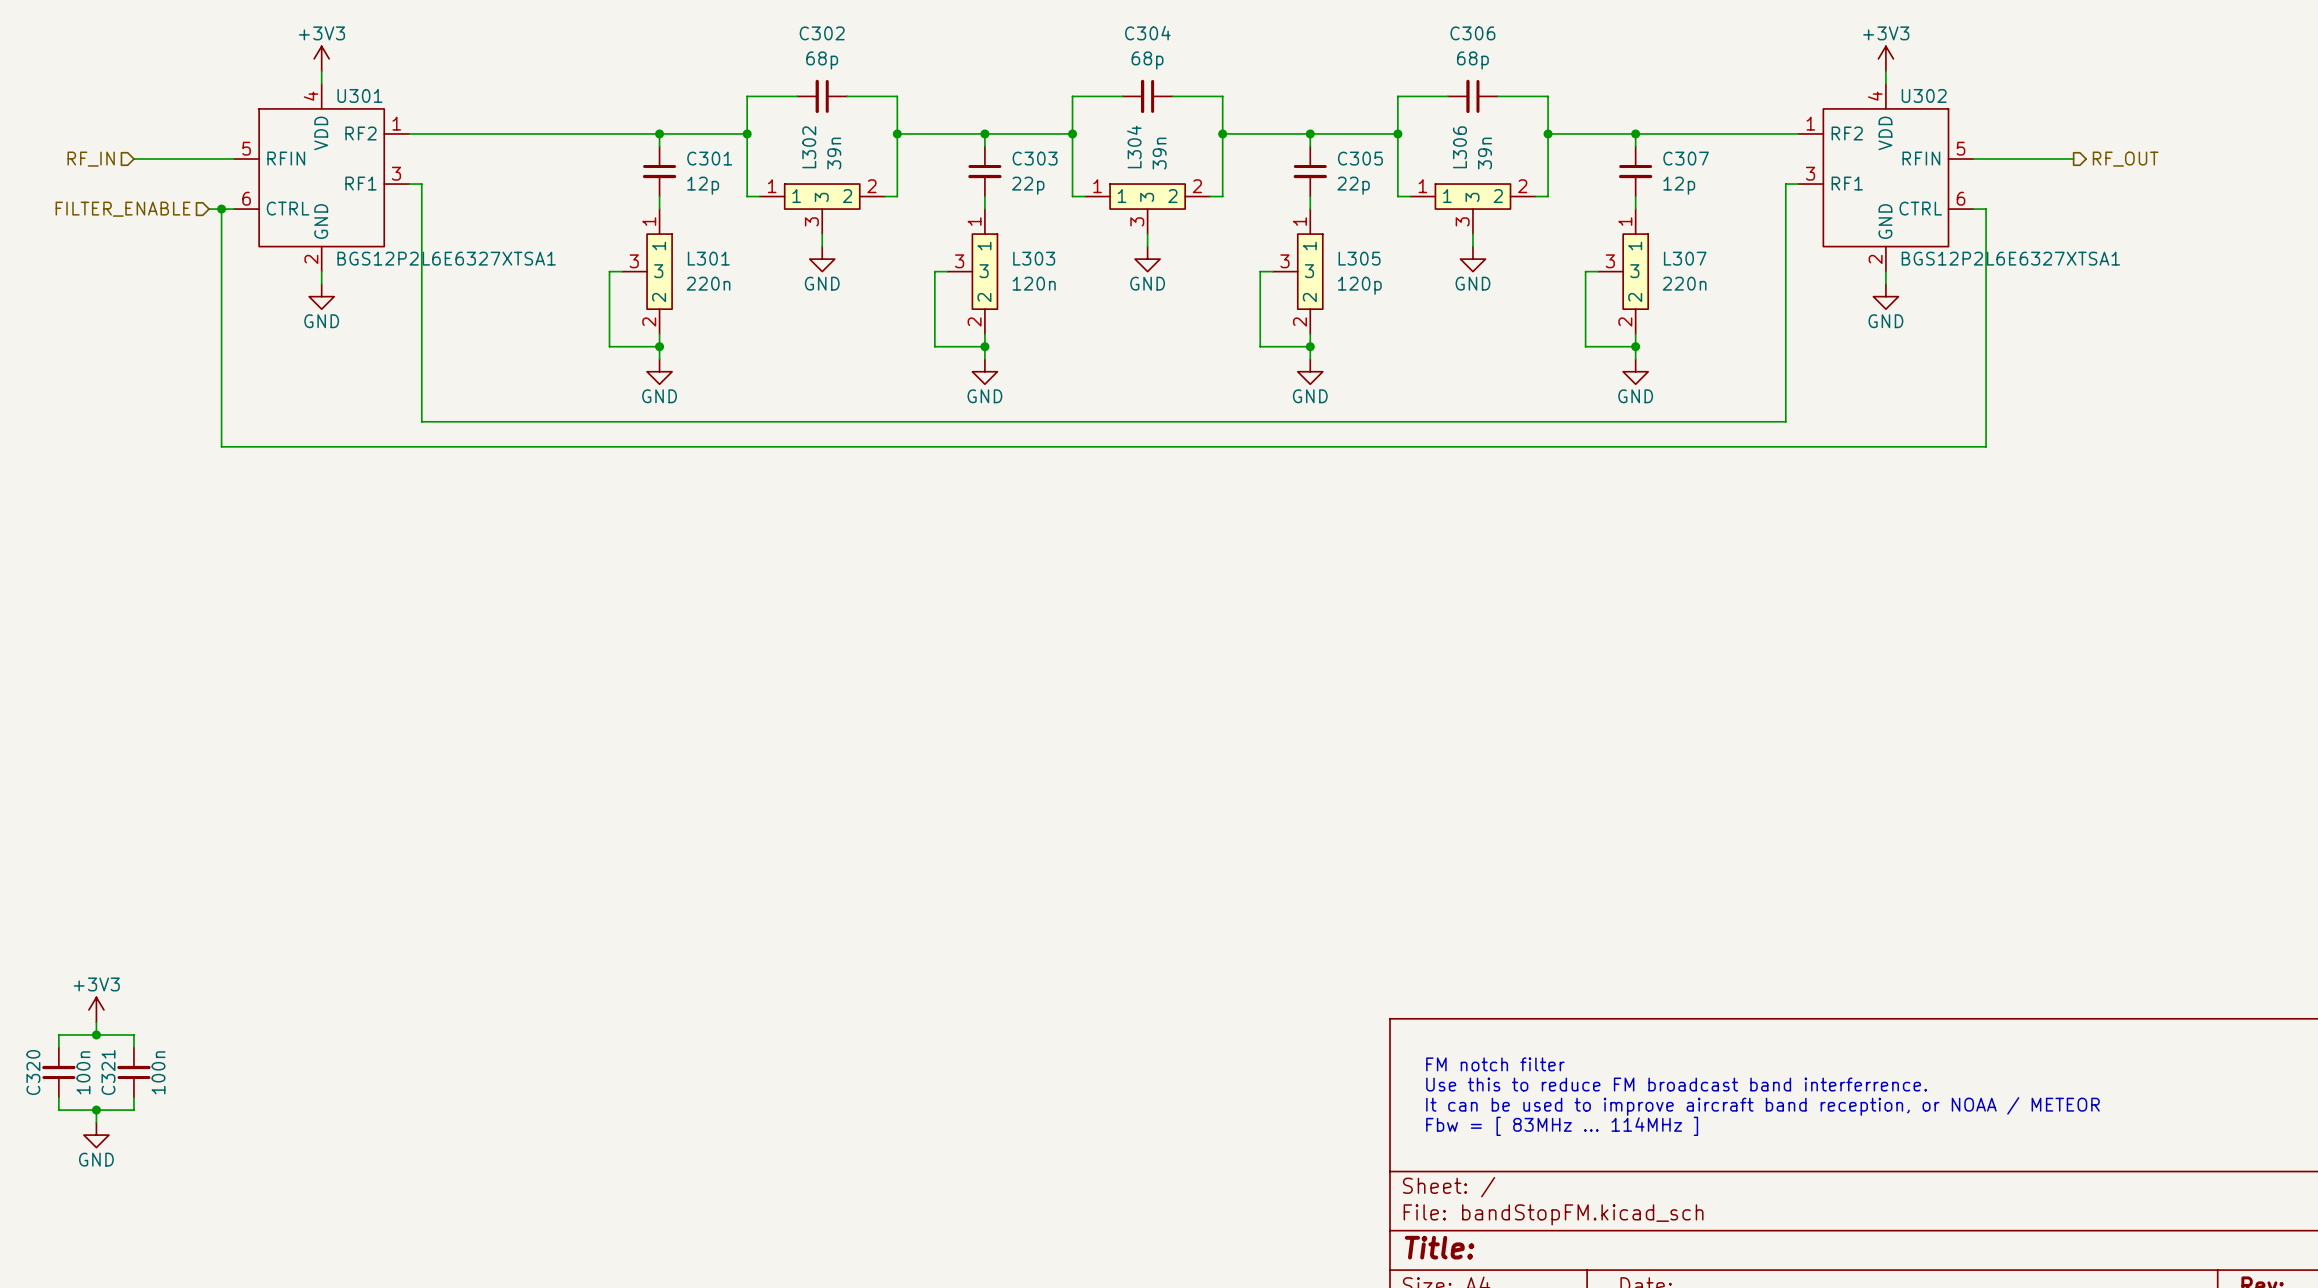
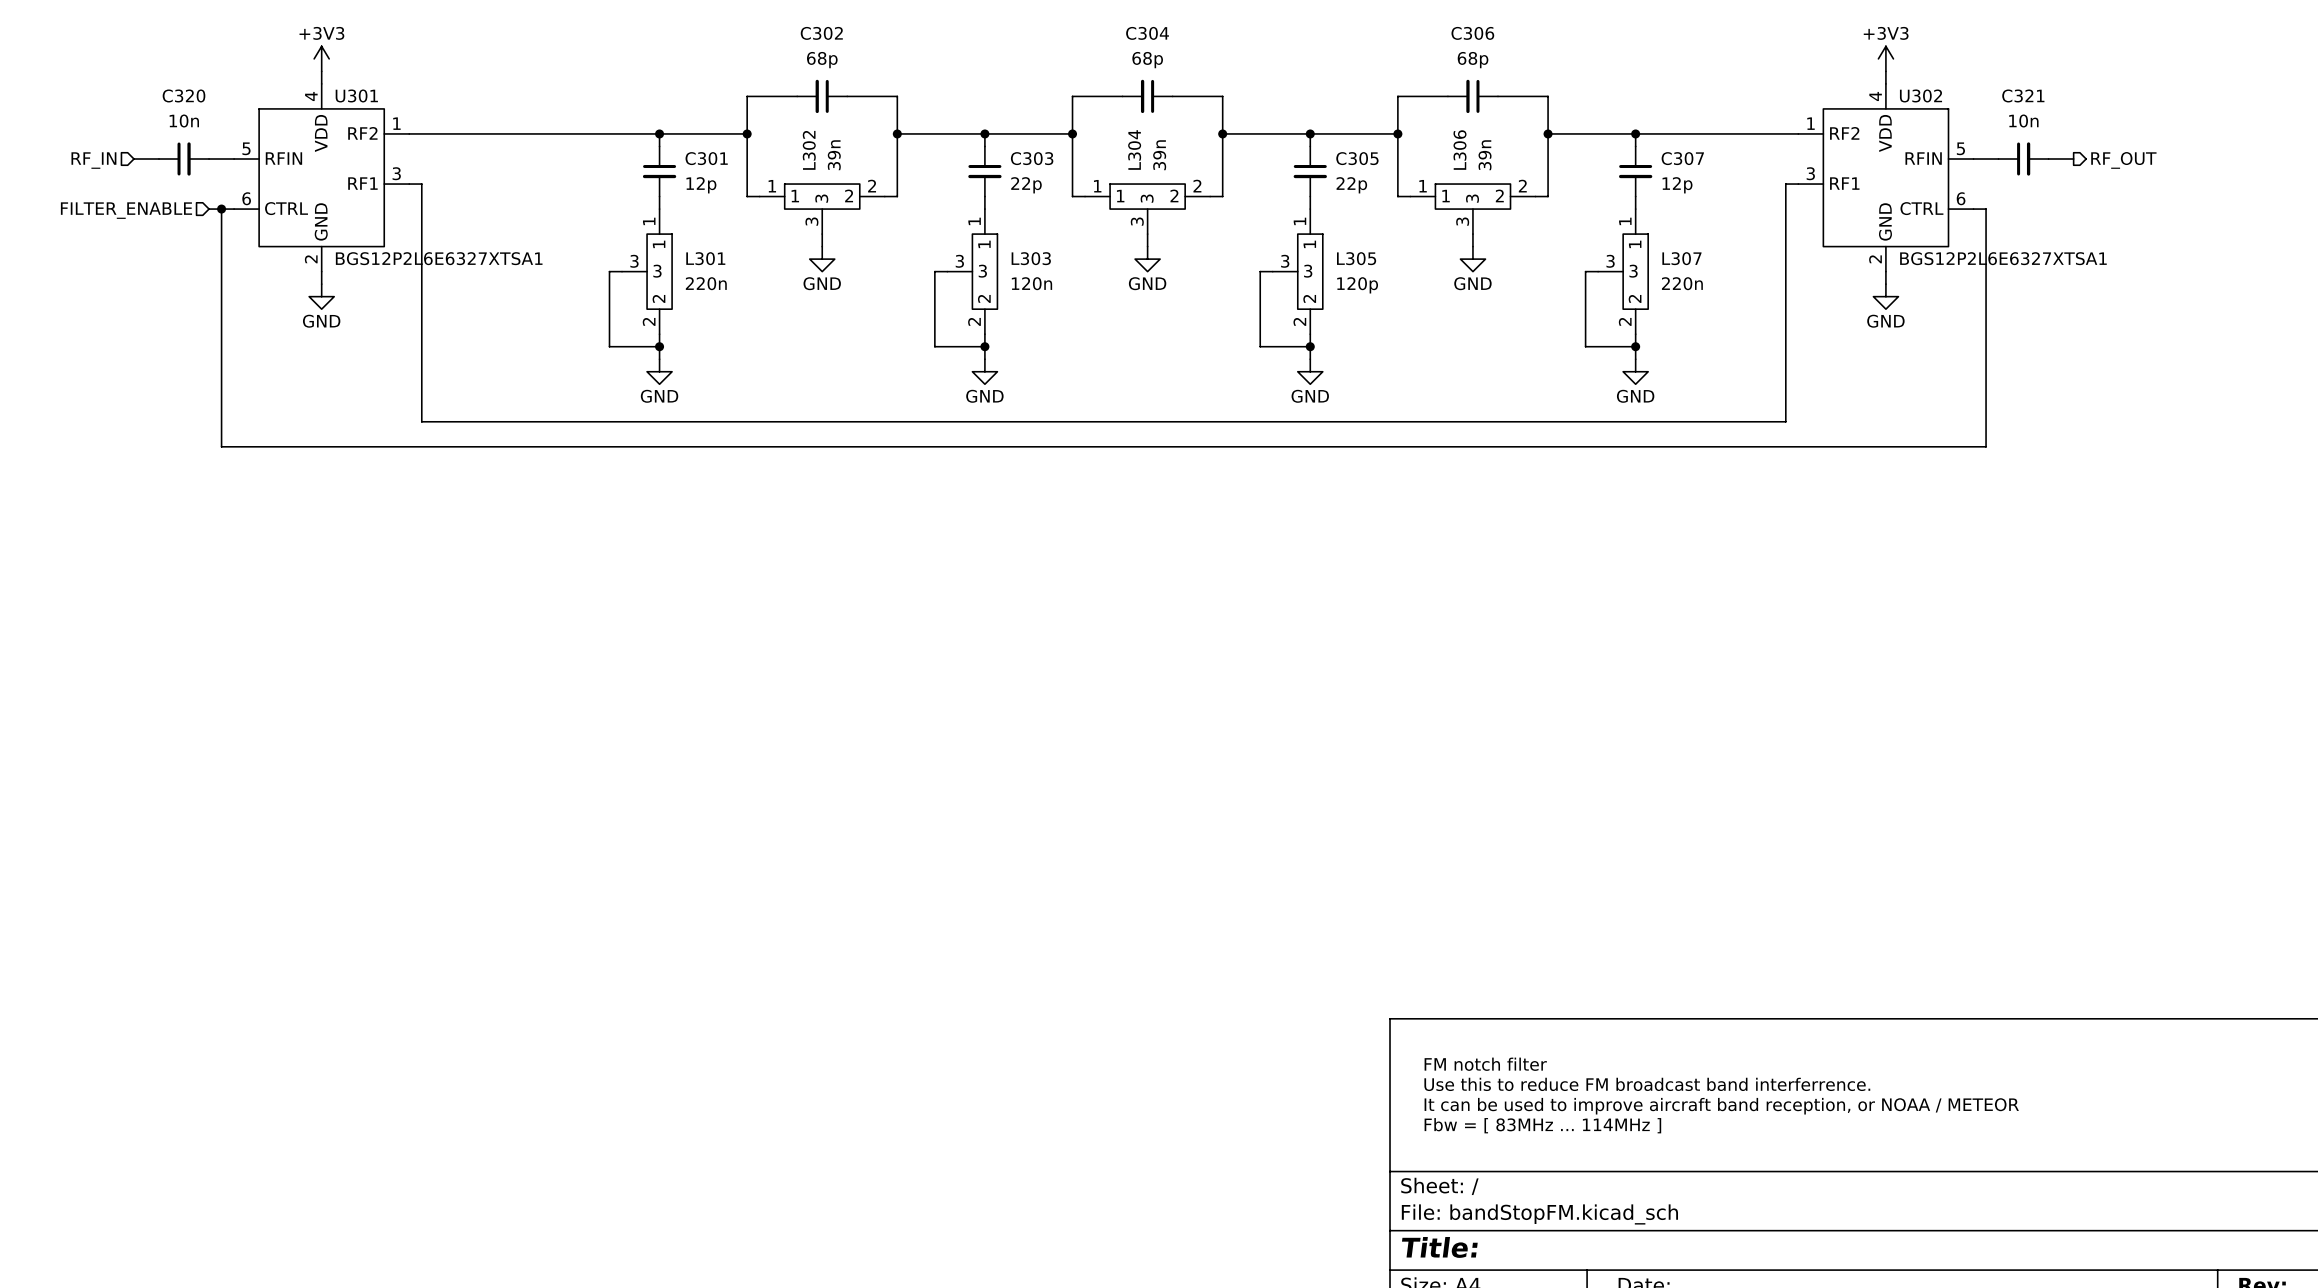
power symbol: +3V3 (96, 1009) -> none
wire: (96, 1022) (96, 1034) -> none
junction: (96, 1034) -> none
wire: (58, 1047) (58, 1034) (133, 1034) (133, 1047) -> none
C320 name position: C320 (33, 1072) -> C320 (184, 95)
C320 rotation: 0° (58, 1072) -> 90° clockwise (184, 159)
C320 position: (58, 1072) -> (184, 159)
C320 value: 100n (83, 1072) -> 10n (184, 120)
C321 name position: C321 (108, 1072) -> C321 (2023, 95)
C321 rotation: 0° (133, 1072) -> 90° clockwise (2023, 159)
C321 position: (133, 1072) -> (2023, 159)
C321 value: 100n (158, 1072) -> 10n (2023, 120)
wire: (58, 1097) (58, 1110) (133, 1110) (133, 1097) -> none
wire: (96, 1110) (96, 1122) -> none
junction: (96, 1110) -> none
power symbol: GND (96, 1135) -> none

